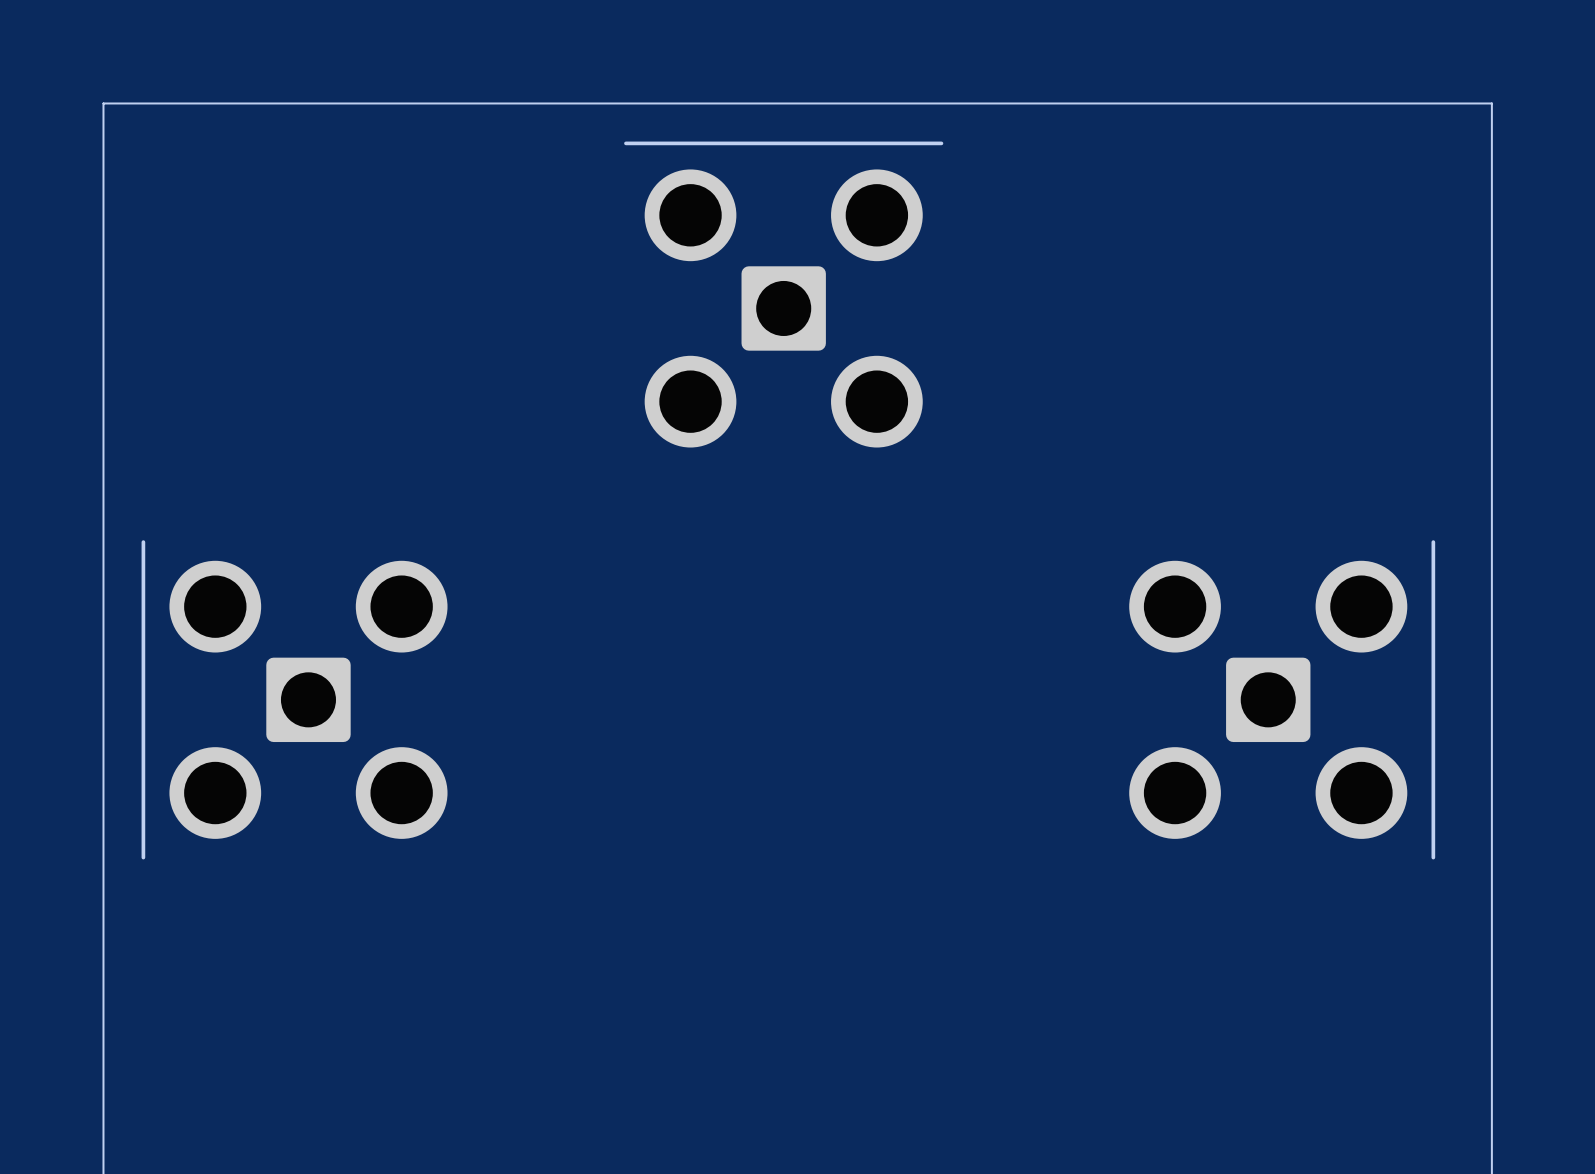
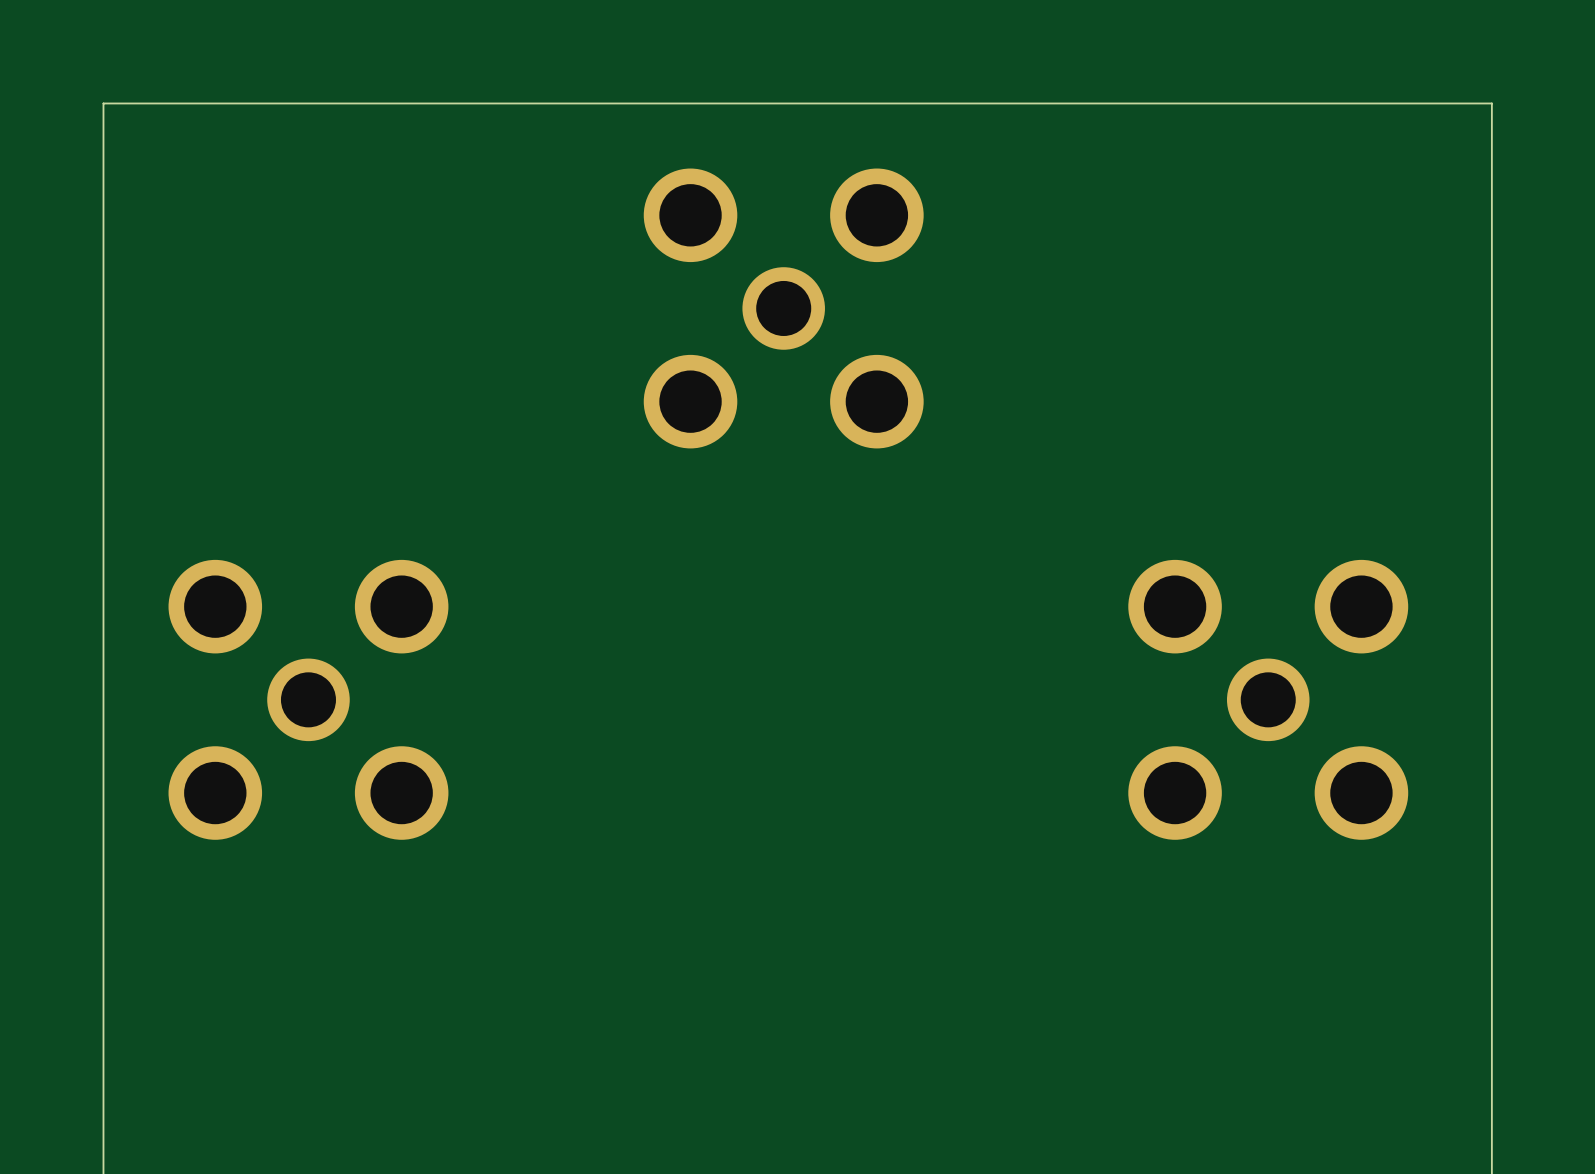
part footprint: [624, 141, 944, 448] -> [643, 168, 924, 449]
part footprint: [141, 540, 448, 860] -> [168, 559, 449, 840]
part footprint: [1129, 540, 1436, 860] -> [1128, 559, 1409, 840]

